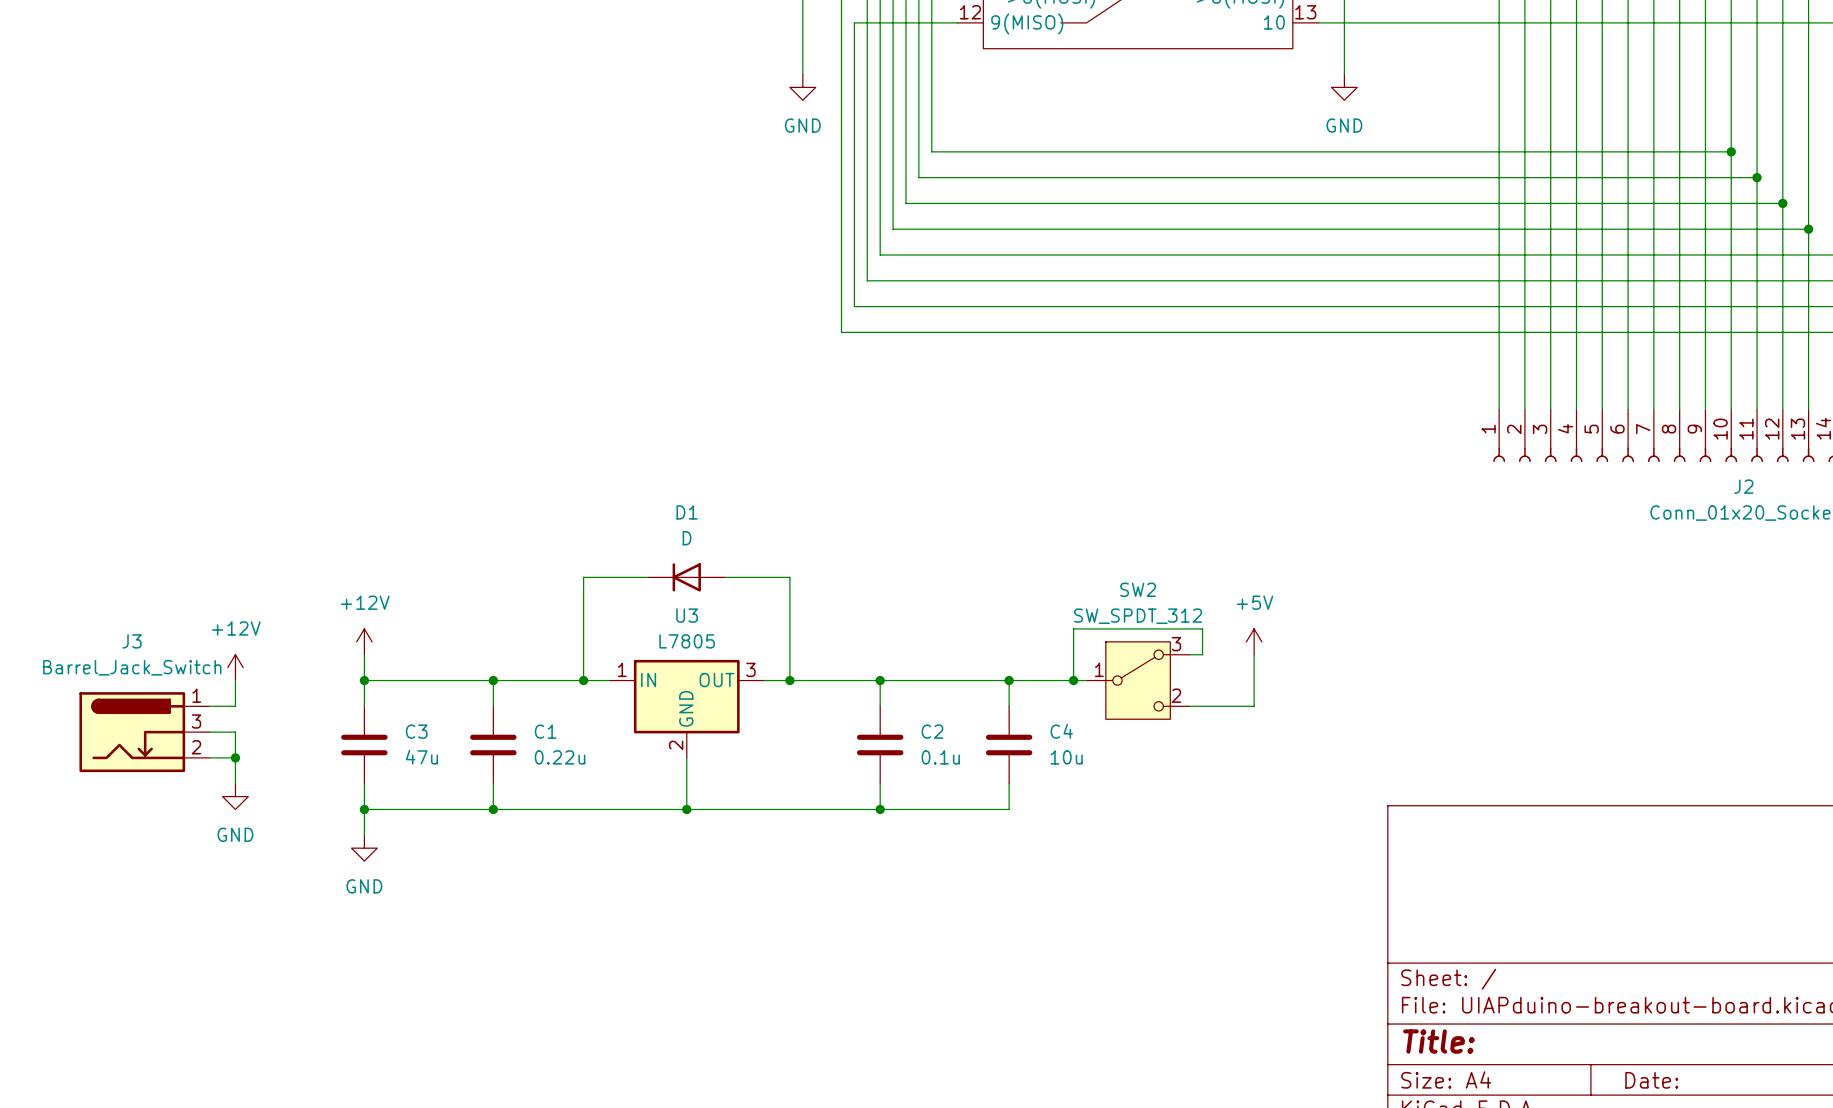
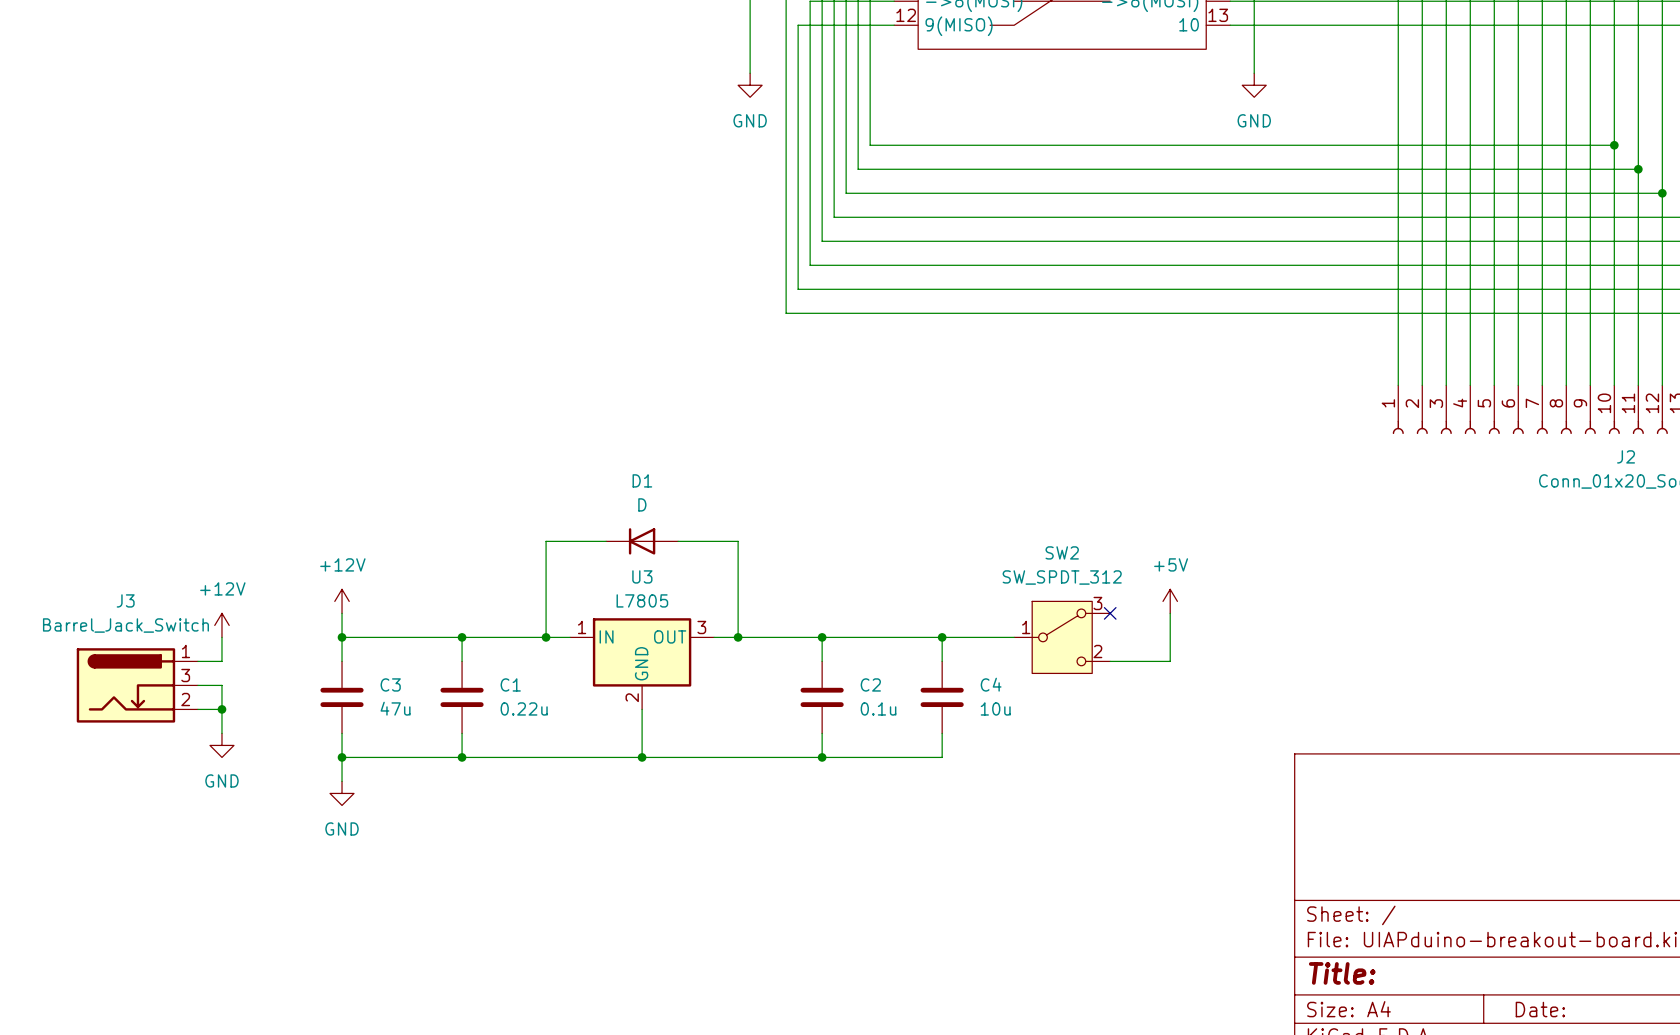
wire: (1189, 654) (1202, 654) (1202, 628) (1073, 628) (1073, 680) -> none
no-connect mark: none -> (1110, 613)
junction: (1073, 680) -> none

